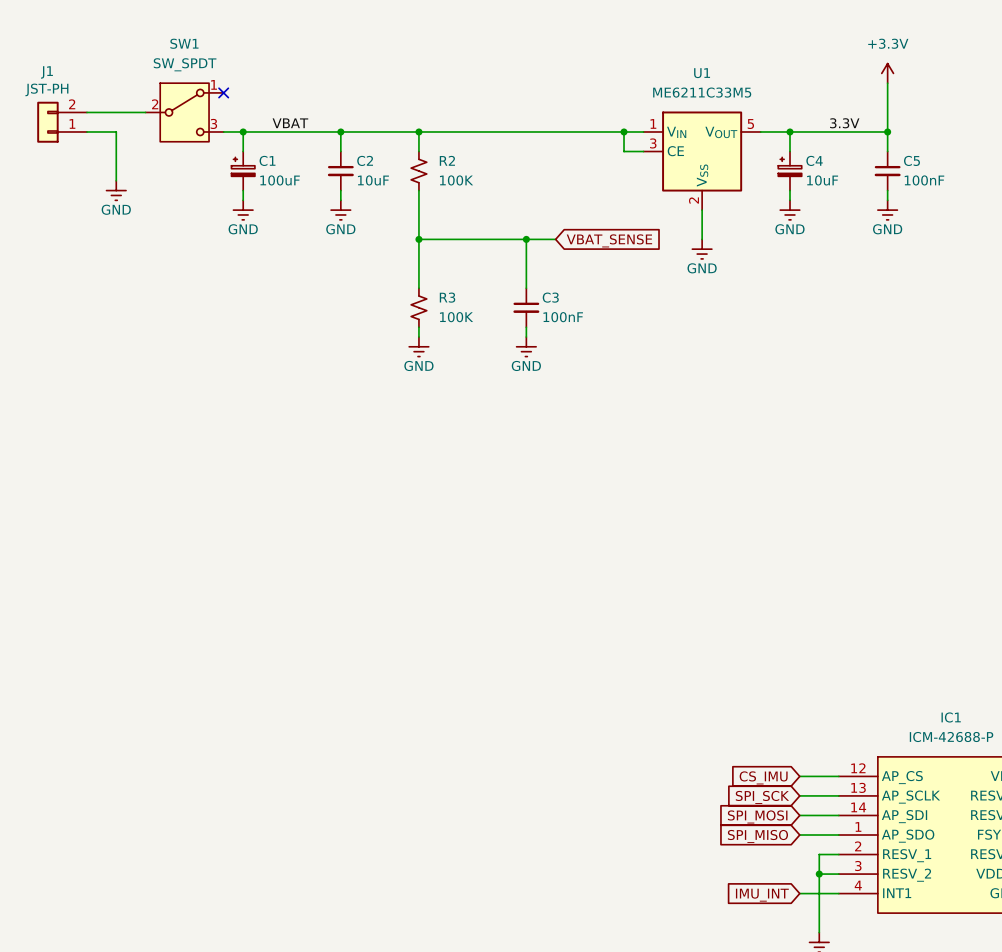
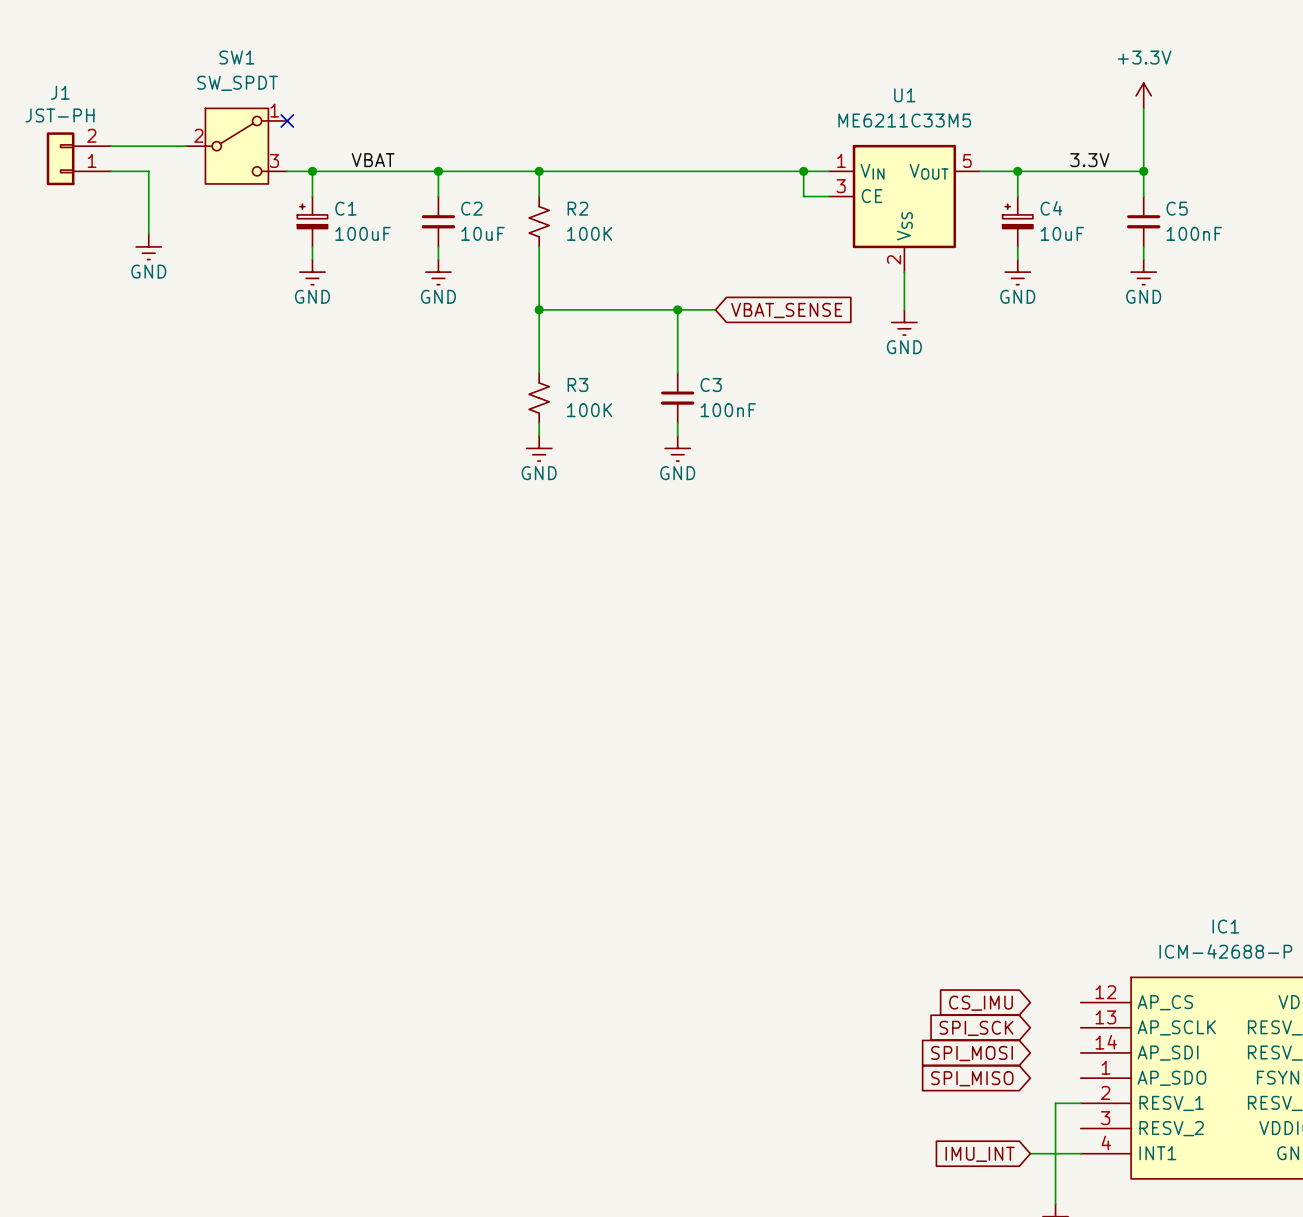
wire: (799, 776) (838, 776) -> none
wire: (799, 795) (838, 795) -> none
wire: (799, 815) (838, 815) -> none
wire: (799, 835) (838, 835) -> none
wire: (819, 874) (838, 874) -> none
junction: (819, 874) -> none

